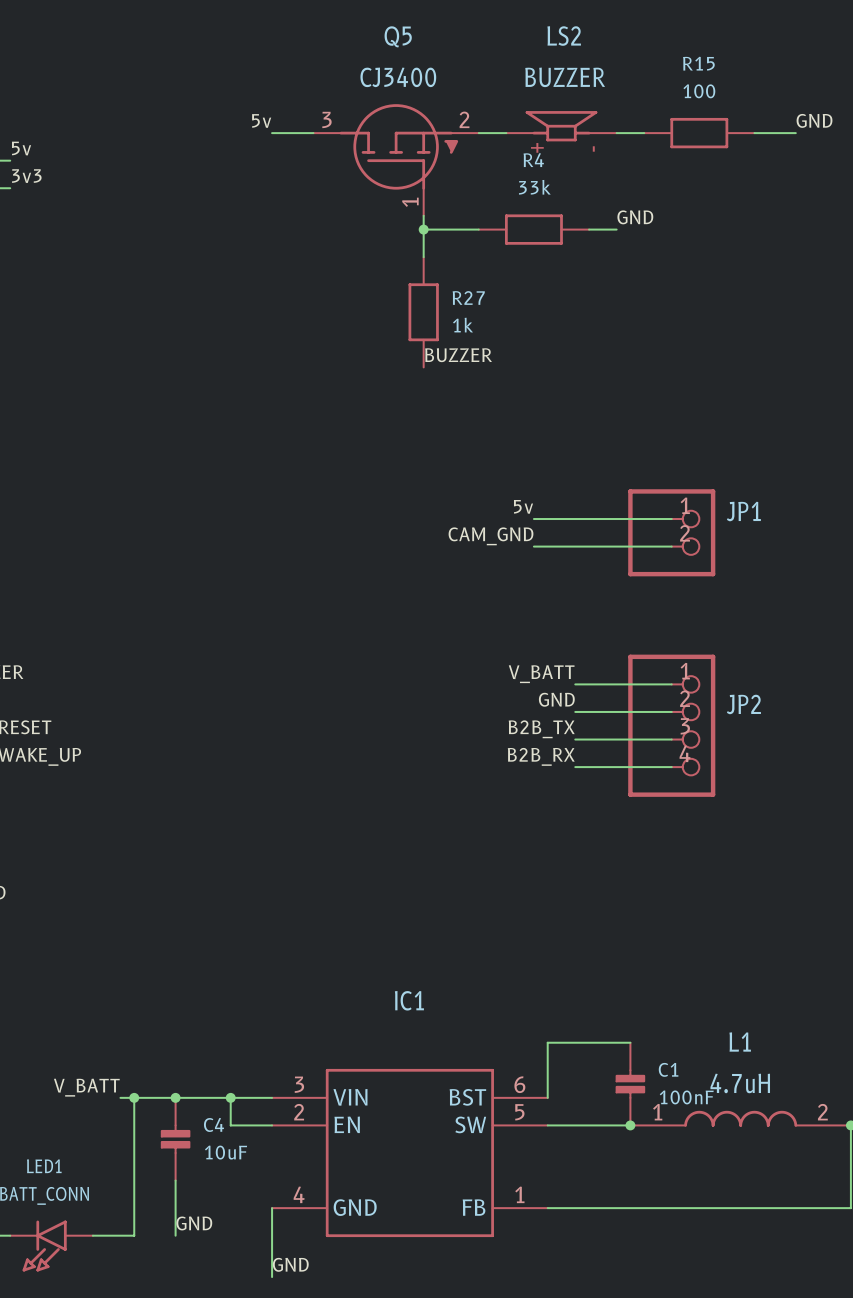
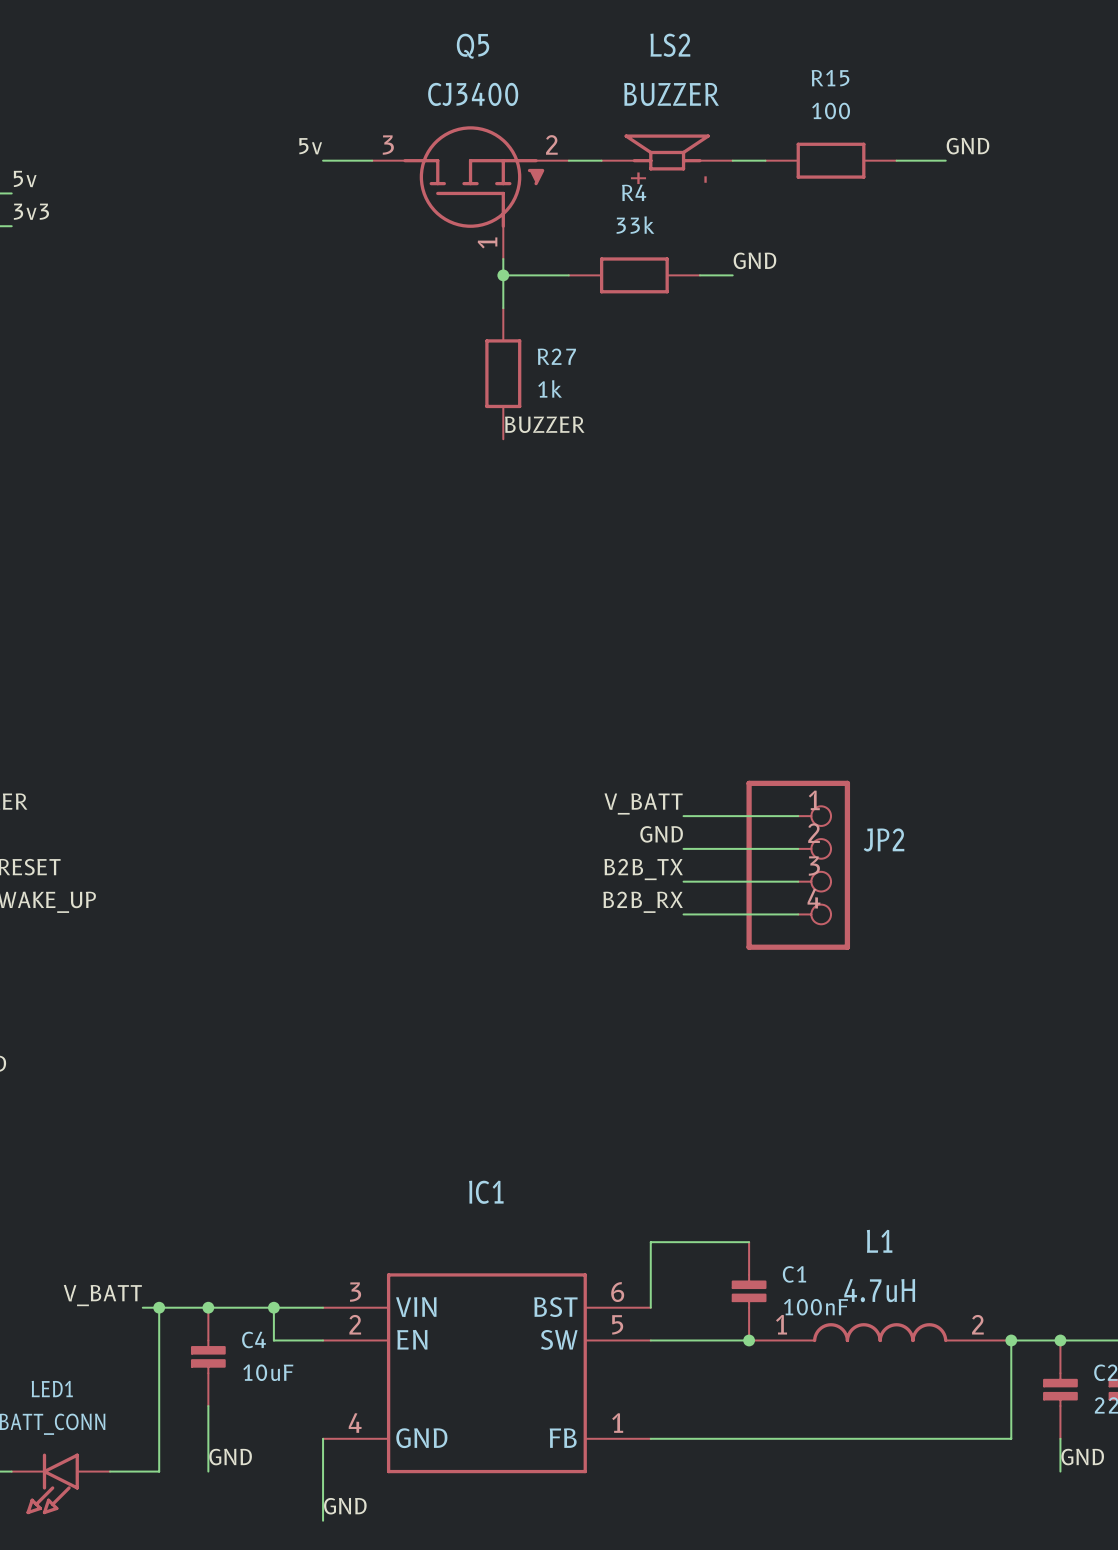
label: 5v (523, 506) -> none
wire: (533, 519) (671, 519) -> none
JP1: (671, 532) -> none
label: CAM_GND (490, 536) -> none
wire: (533, 546) (671, 546) -> none

